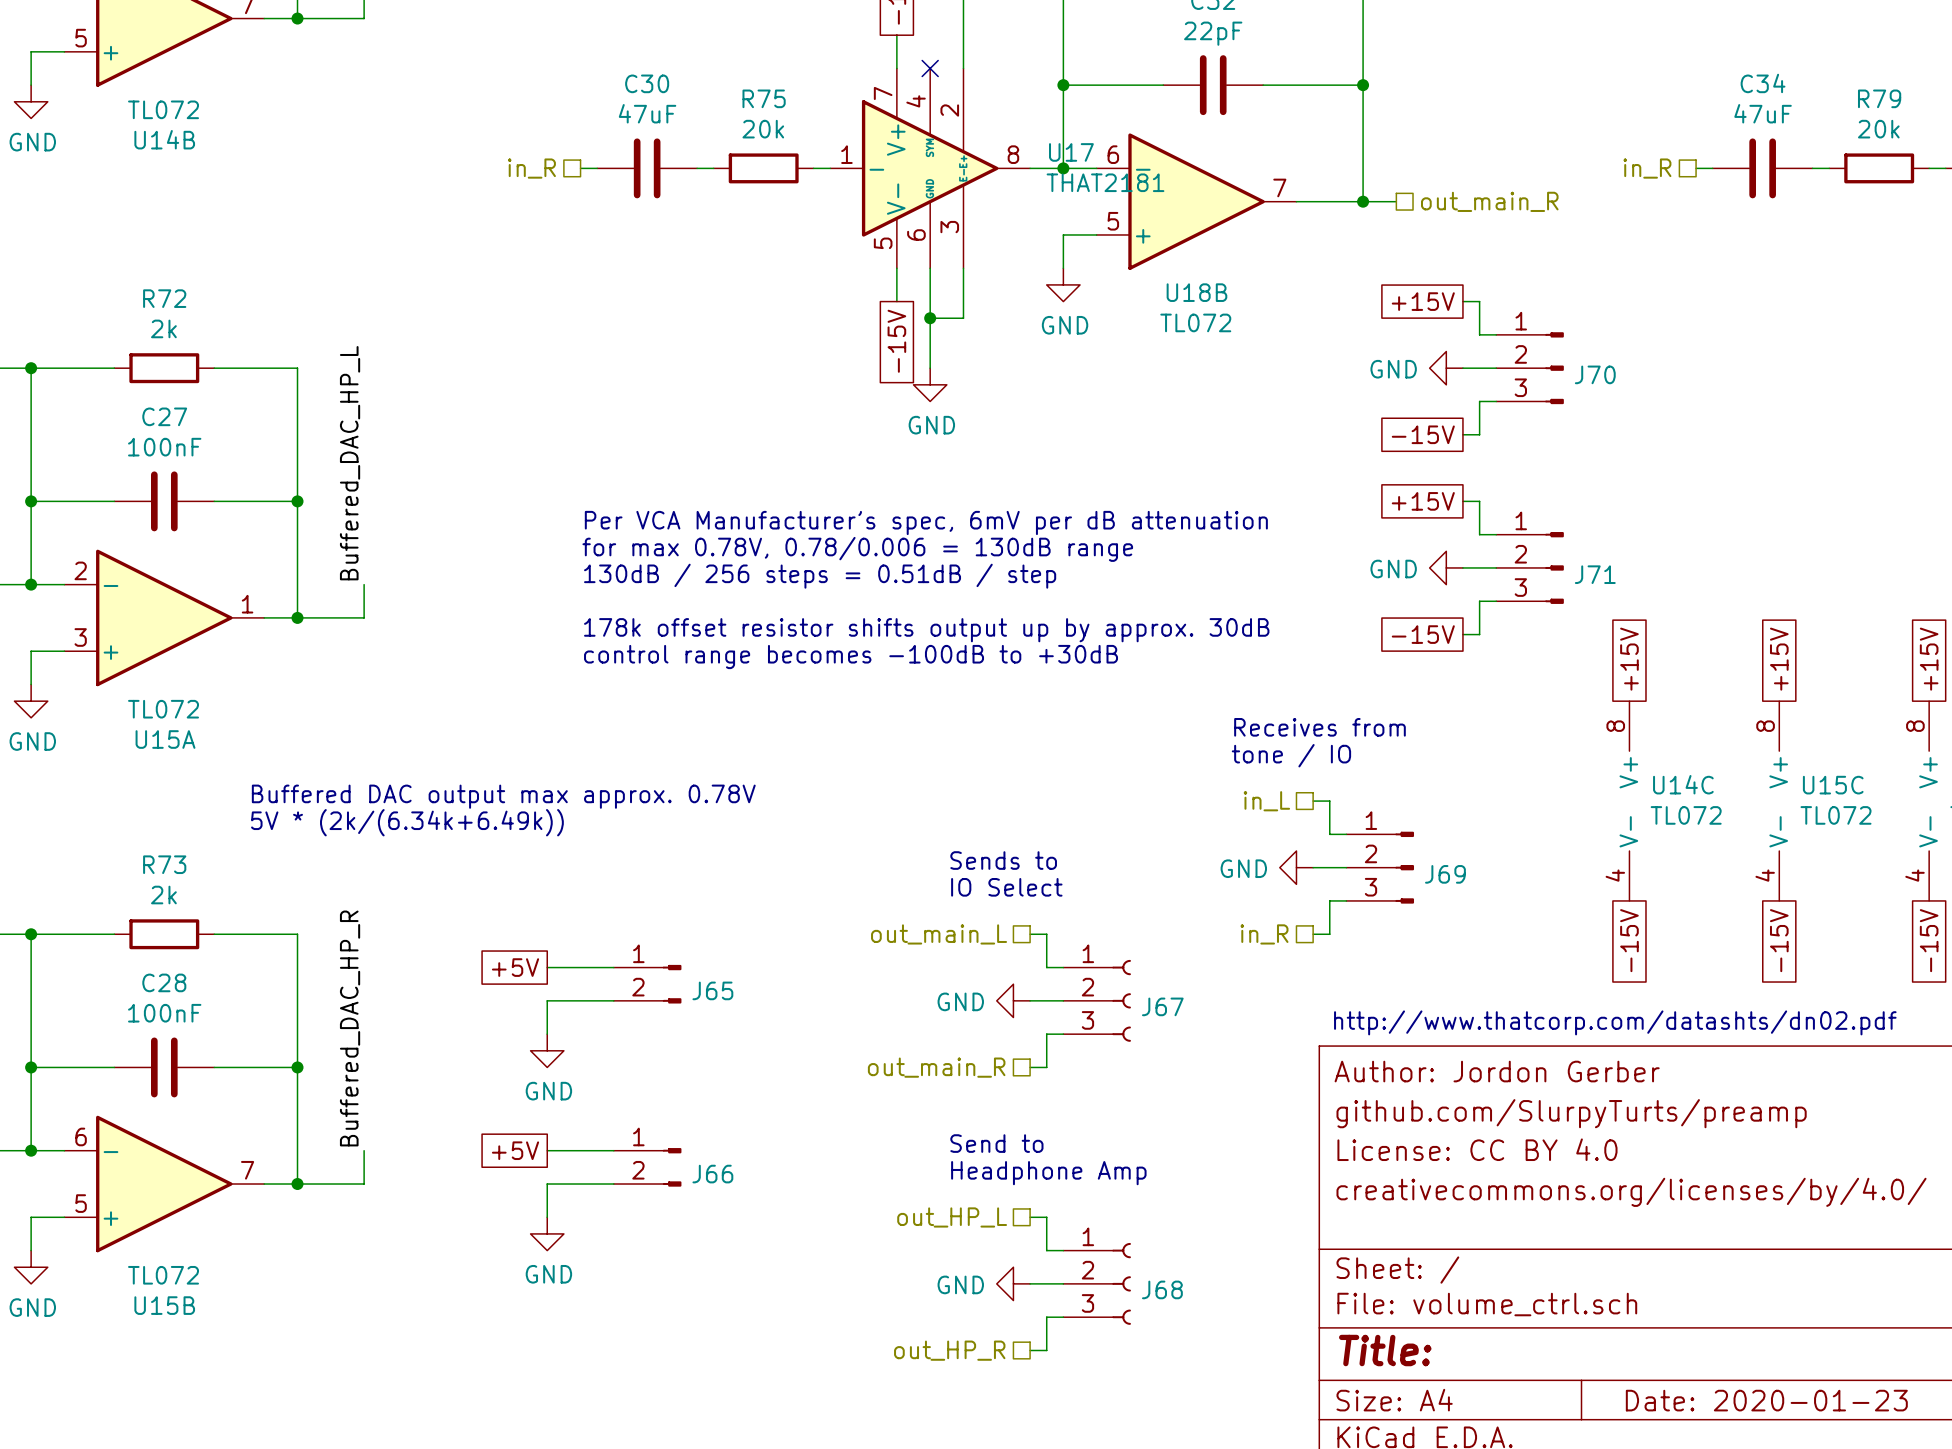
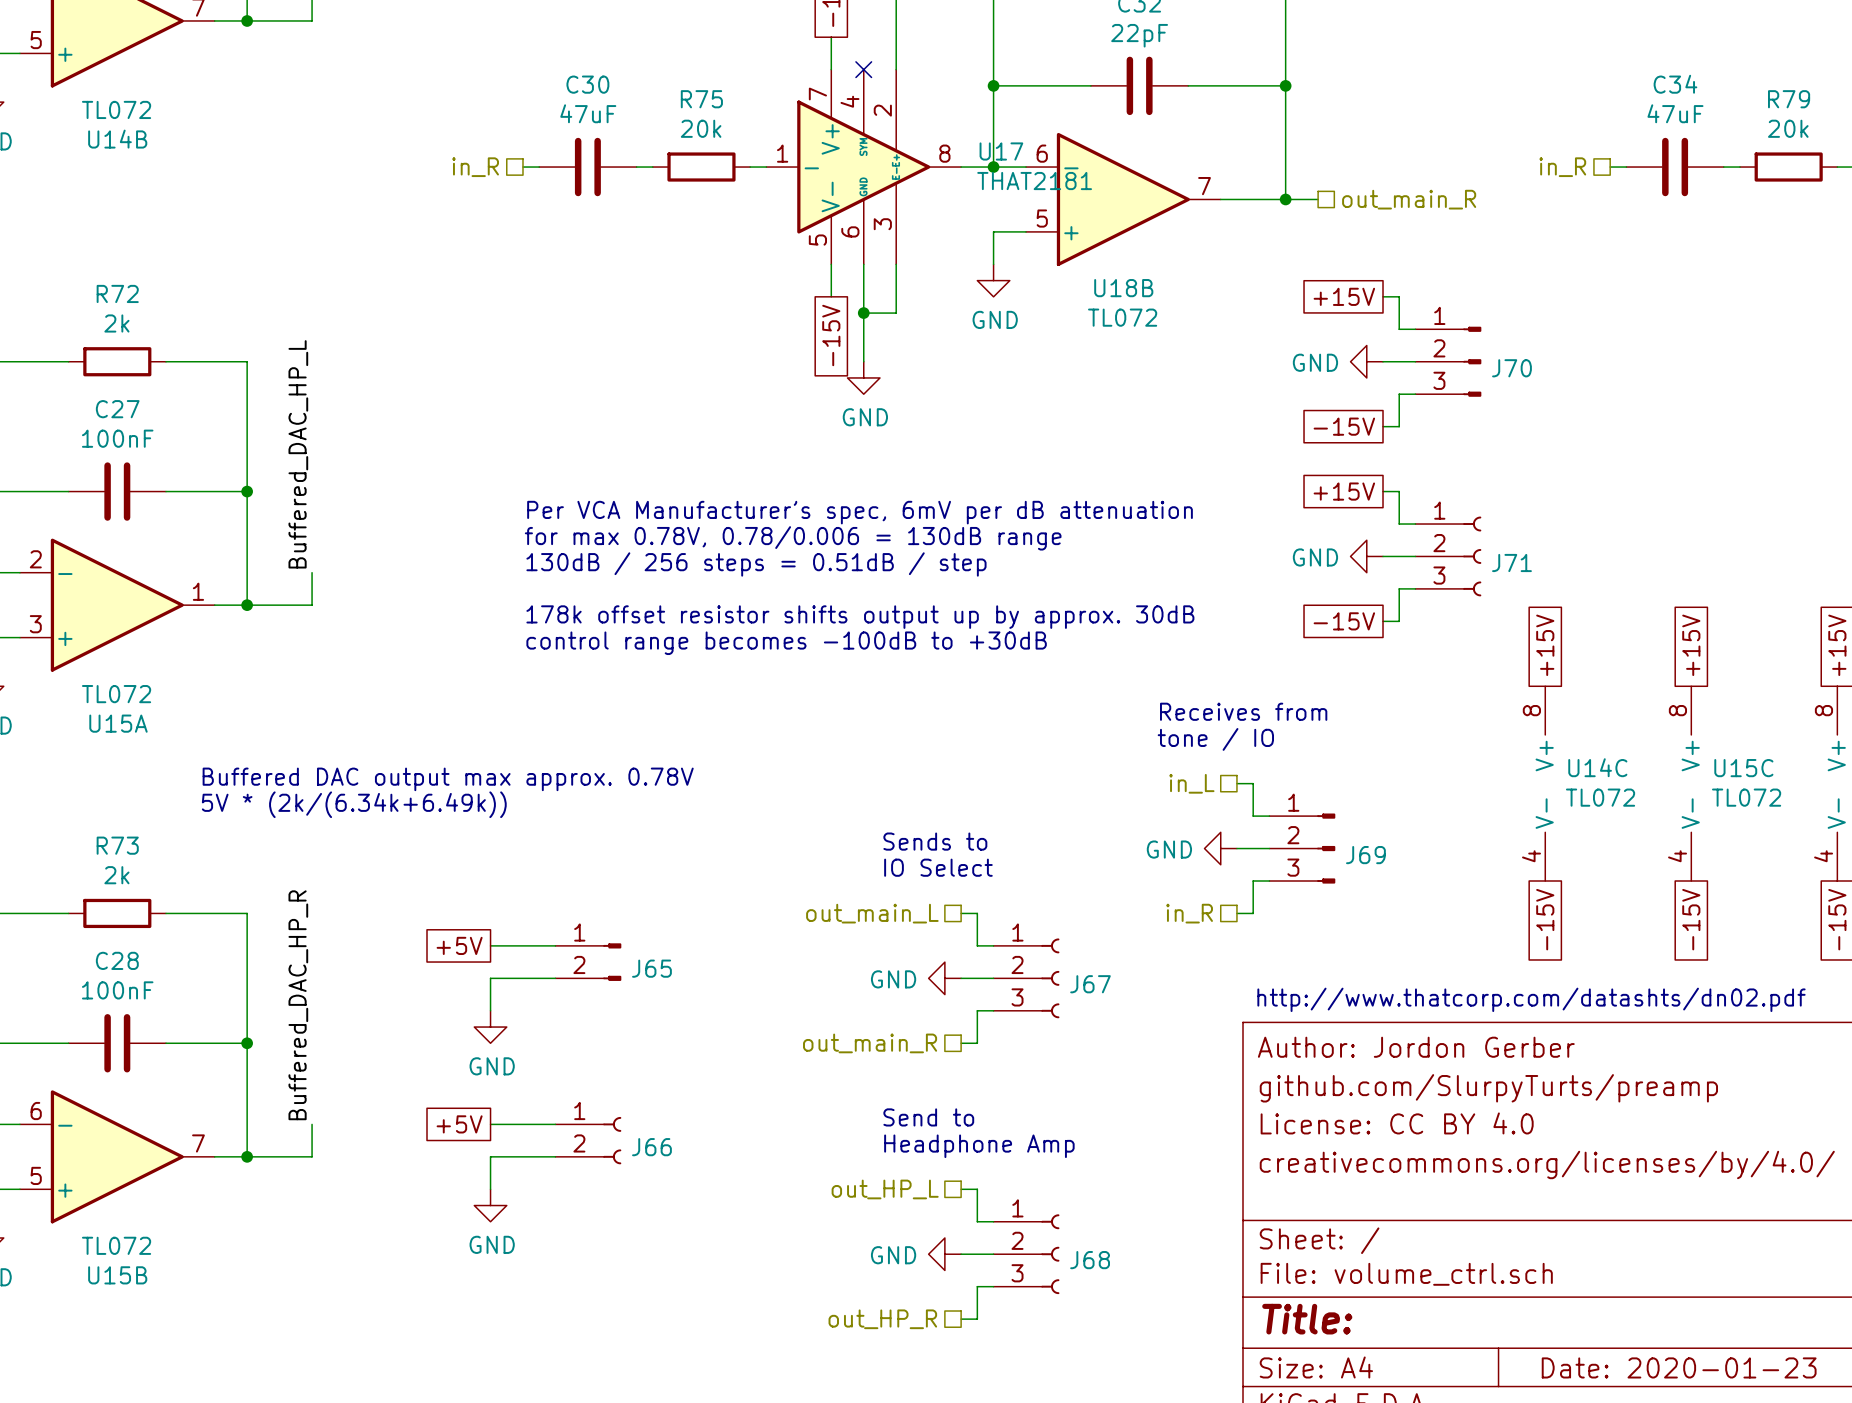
J71 symbol: [1496, 532, 1564, 604] -> [1415, 516, 1482, 597]
J66 symbol: [613, 1148, 682, 1187] -> [555, 1116, 622, 1165]

